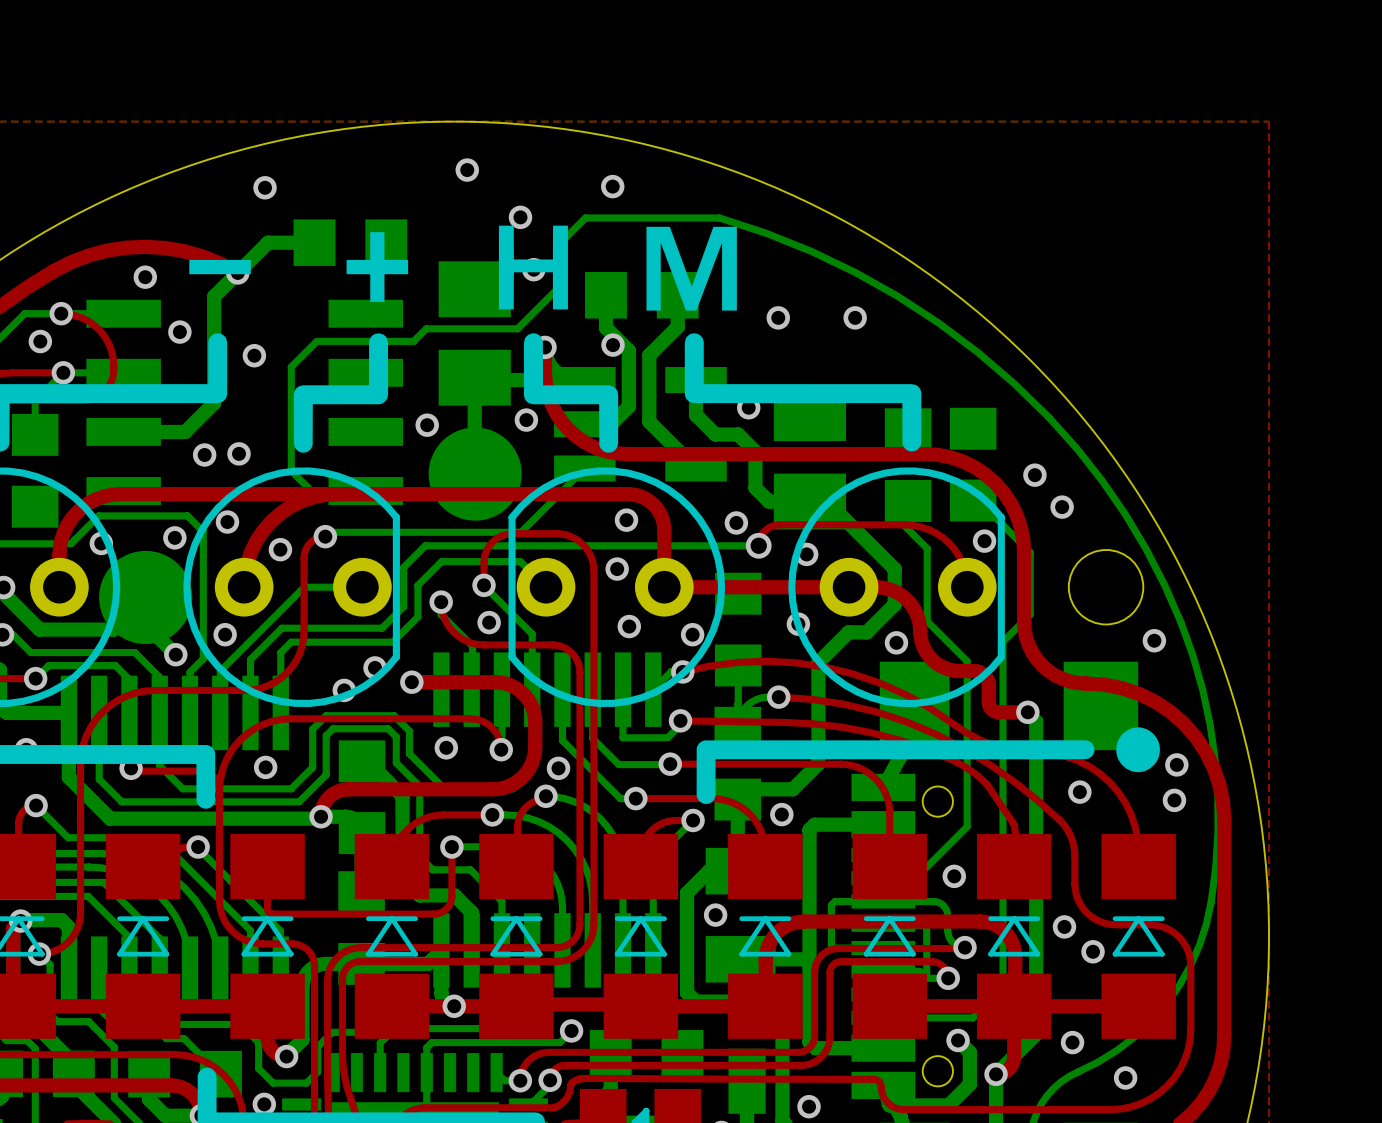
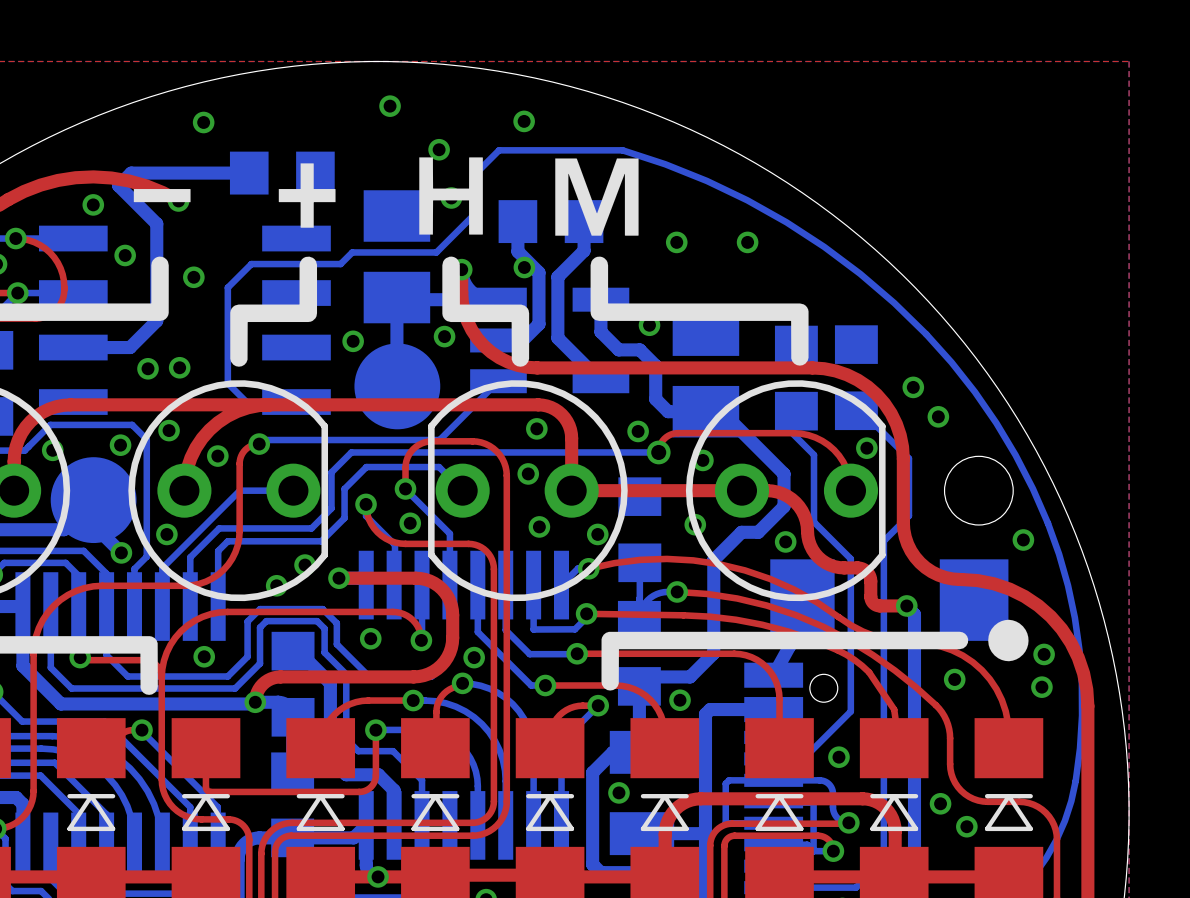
bottom track: (268, 242) (214, 297) -> (206, 173) (131, 173) (118, 185) (156, 223)

